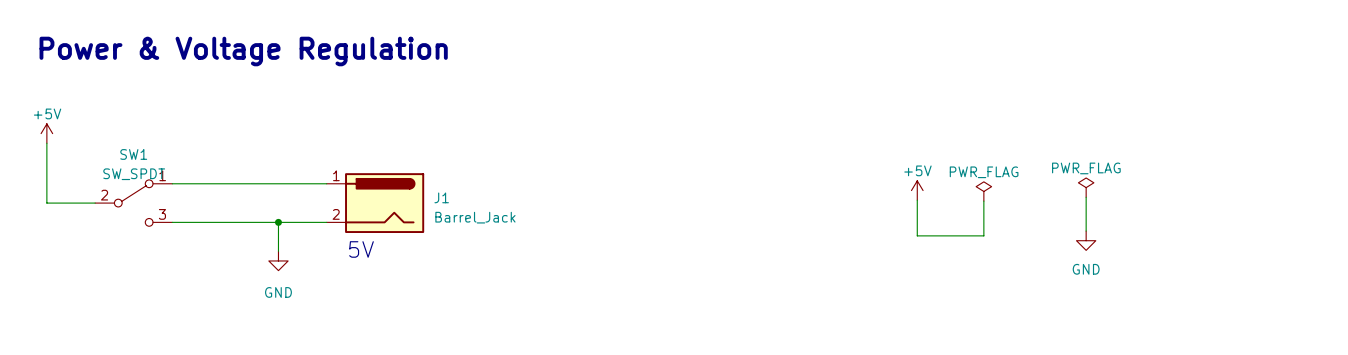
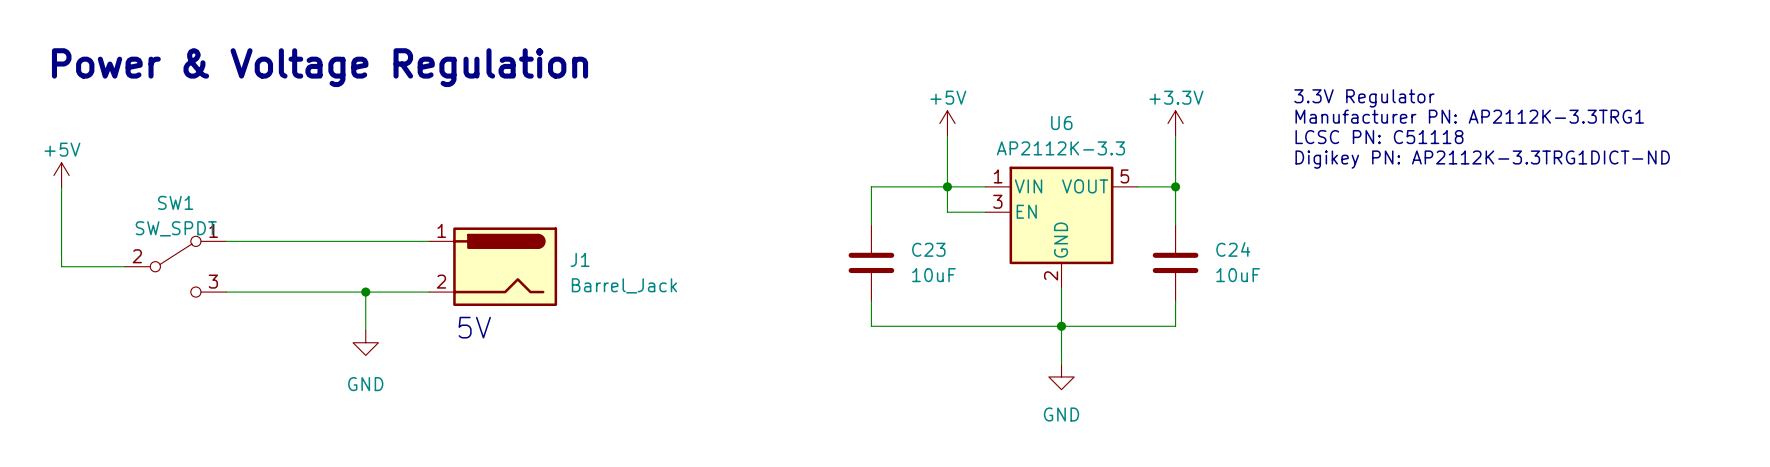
text: none -> 3.3V Regulator (1364, 98)
text: none -> Manufacturer PN: AP2112K-3.3TRG1 (1469, 116)
power symbol: none -> +5V (947, 123)
power symbol: none -> +3.3V (1175, 123)
wire: none -> (947, 136) (947, 212) (985, 212)
wire: none -> (1175, 136) (1175, 224)
text: none -> LCSC PN: C51118 (1379, 137)
text: none -> Digikey PN: AP2112K-3.3TRG1DICT-ND (1482, 159)
junction: none -> (947, 186)
wire: none -> (985, 186) (871, 186) (871, 224)
wire: none -> (1137, 186) (1175, 186)
junction: none -> (1175, 186)
U6: none -> AP2112K-3.3 (1061, 227)
power symbol: PWR_FLAG (1086, 187) -> none
power symbol: +5V (917, 190) -> none
power symbol: PWR_FLAG (983, 191) -> none
wire: (1086, 197) (1086, 231) -> none
C23: none -> 10uF (871, 262)
C24: none -> 10uF (1175, 262)
wire: (917, 200) (917, 235) (983, 235) (983, 201) -> none
wire: none -> (1061, 288) (1061, 364)
wire: none -> (871, 300) (871, 326) (1175, 326) (1175, 300)
power symbol: GND (1086, 240) -> none
junction: none -> (1061, 326)
power symbol: none -> GND (1061, 376)

